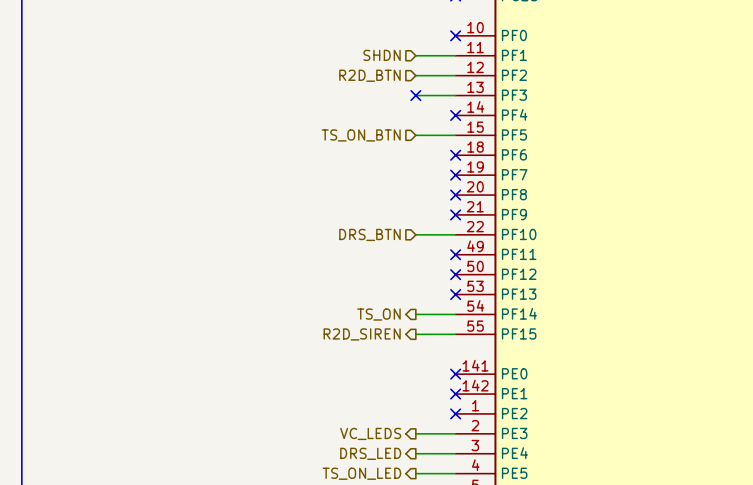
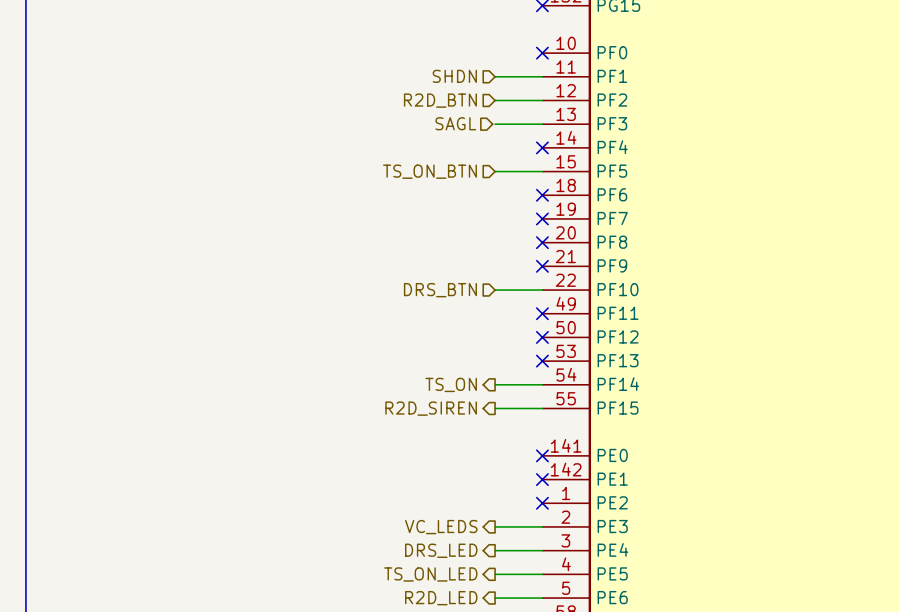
hierarchical label: none -> SAGL (455, 123)
no-connect mark: (415, 95) -> none

